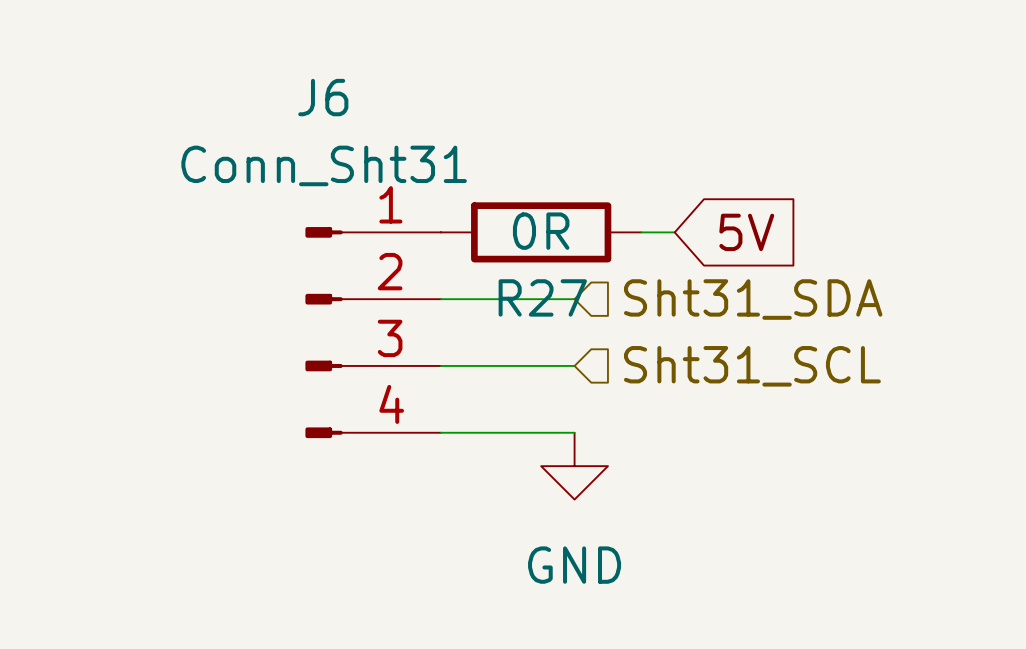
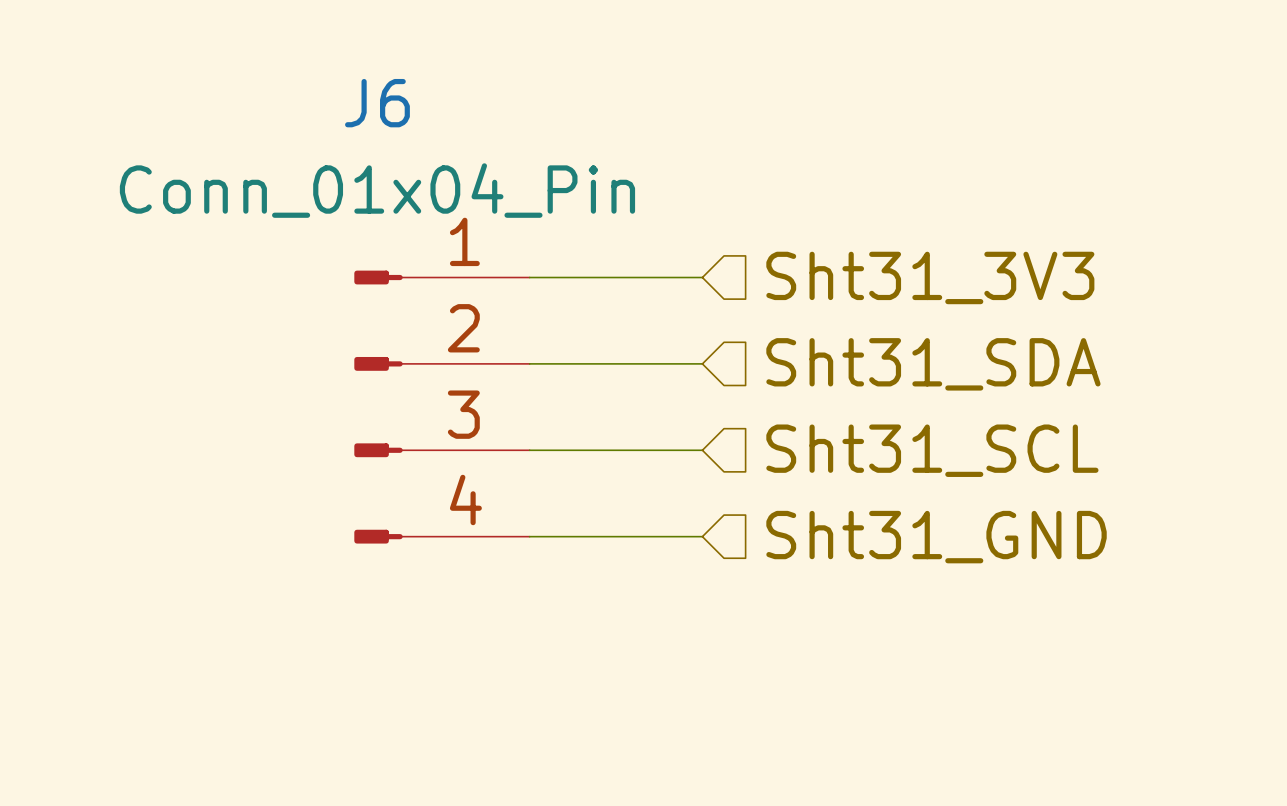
J6 value: Conn_Sht31 (324, 165) -> Conn_01x04_Pin (377, 190)
wire: none -> (529, 277) (702, 277)
R27: 0R (541, 232) -> none
wire: (641, 232) (674, 232) -> none
global label: 5V (746, 232) -> none
hierarchical label: none -> Sht31_3V3 (930, 277)
hierarchical label: none -> Sht31_GND (936, 537)
power symbol: GND (574, 466) -> none

